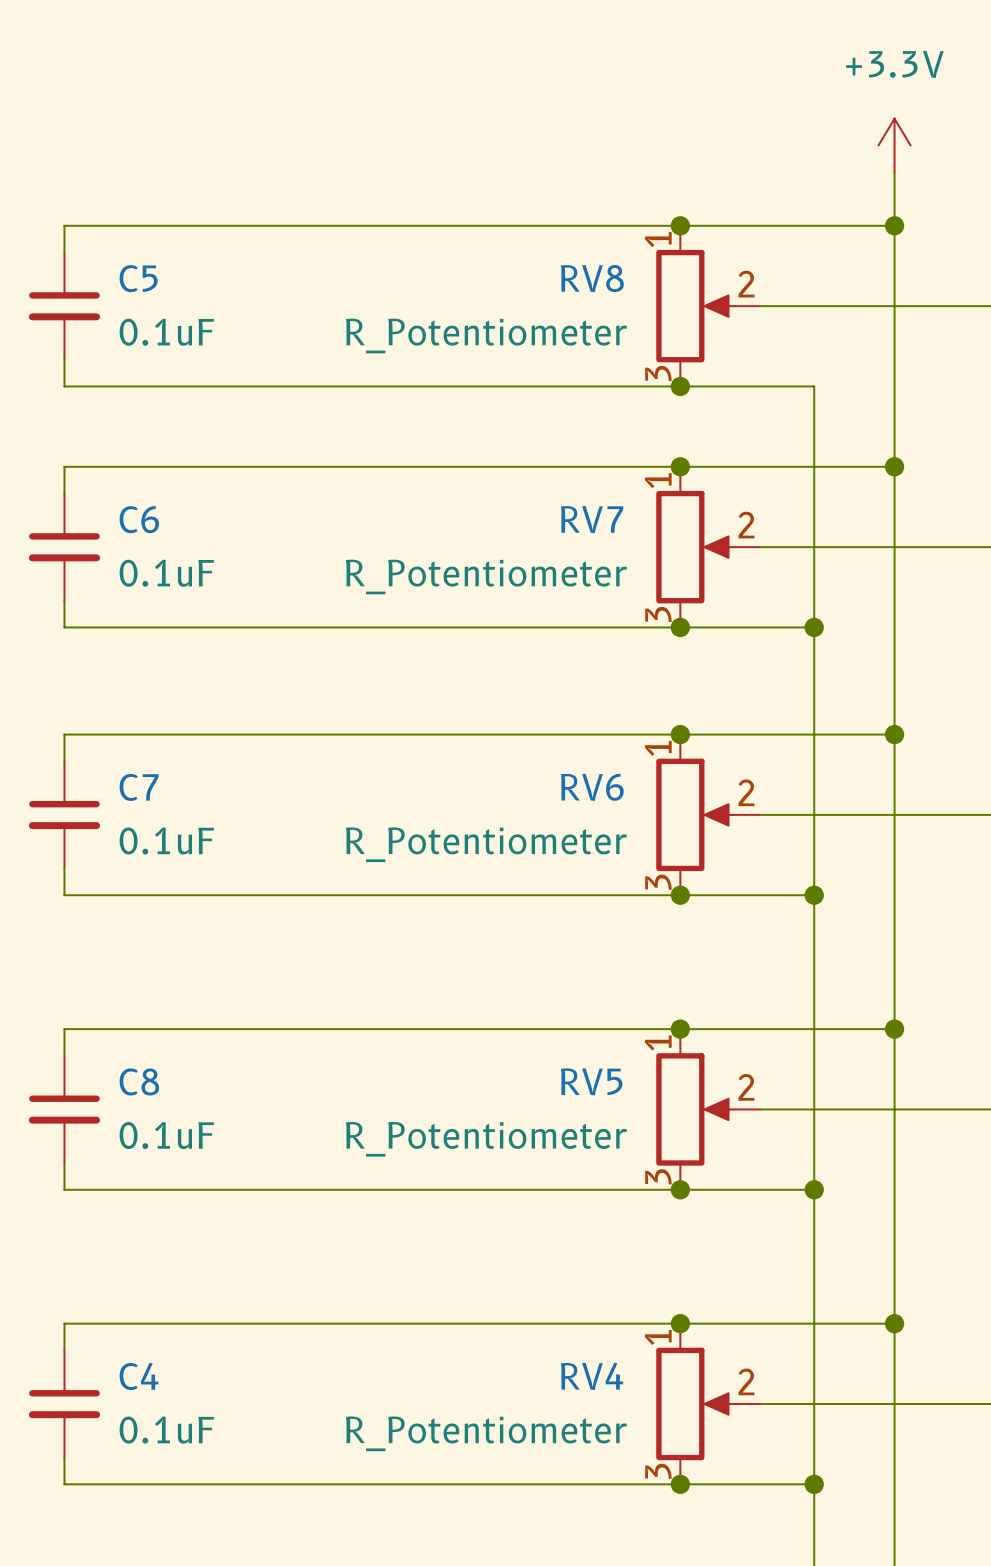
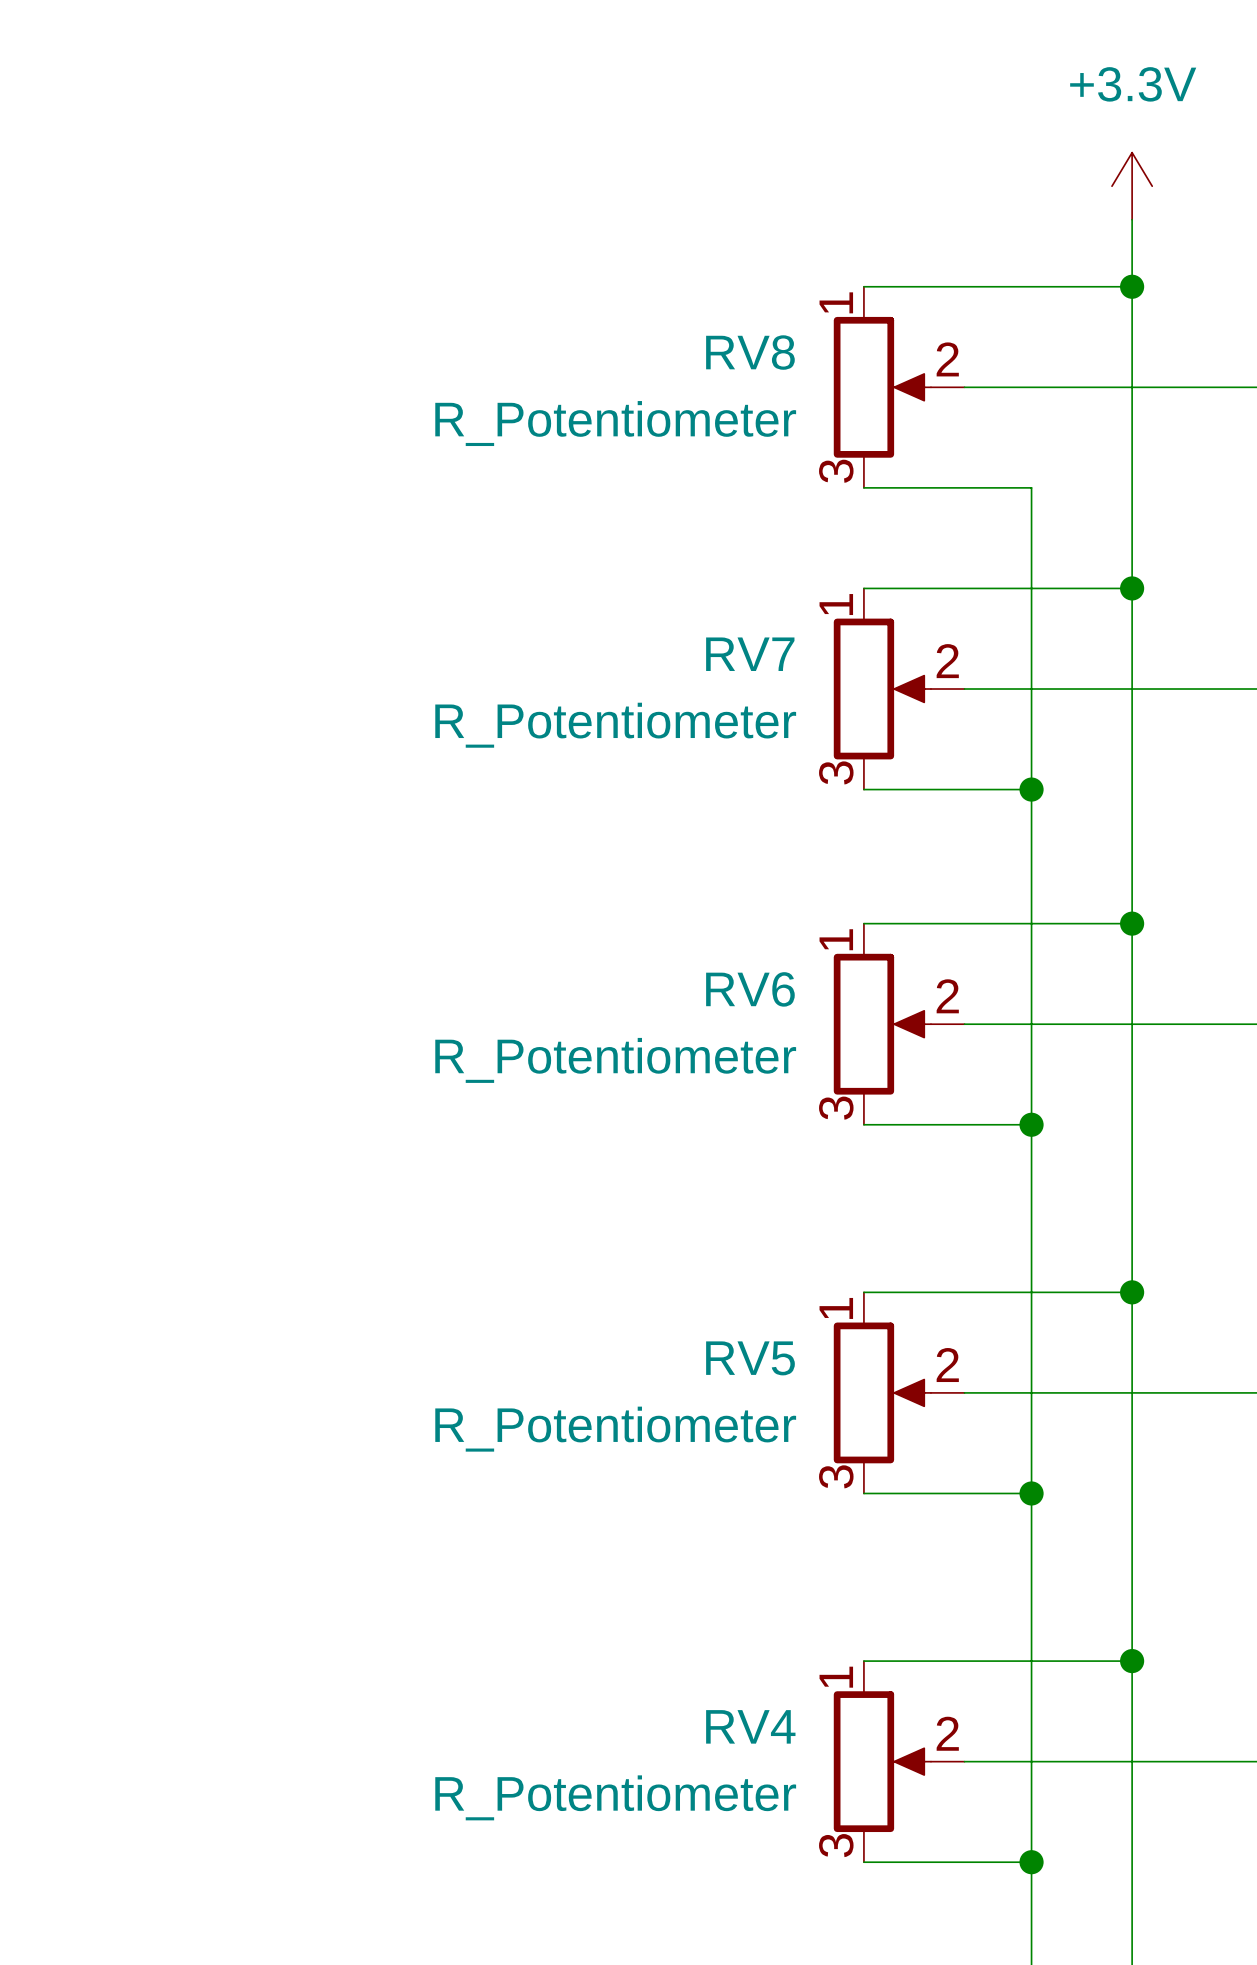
wire: (680, 225) (64, 225) (64, 252) -> none
junction: (680, 225) -> none
C5: 0.1uF (64, 306) -> none
wire: (64, 359) (64, 386) (680, 386) -> none
junction: (680, 386) -> none
wire: (680, 466) (64, 466) (64, 493) -> none
junction: (680, 466) -> none
C6: 0.1uF (64, 547) -> none
wire: (64, 600) (64, 627) (680, 627) -> none
junction: (680, 627) -> none
wire: (680, 734) (64, 734) (64, 761) -> none
junction: (680, 734) -> none
C7: 0.1uF (64, 814) -> none
wire: (64, 868) (64, 895) (680, 895) -> none
junction: (680, 895) -> none
wire: (680, 1029) (64, 1029) (64, 1055) -> none
junction: (680, 1029) -> none
C8: 0.1uF (64, 1109) -> none
wire: (64, 1163) (64, 1189) (680, 1189) -> none
junction: (680, 1189) -> none
wire: (680, 1323) (64, 1323) (64, 1350) -> none
junction: (680, 1323) -> none
C4: 0.1uF (64, 1403) -> none
wire: (64, 1457) (64, 1484) (680, 1484) -> none
junction: (680, 1484) -> none

